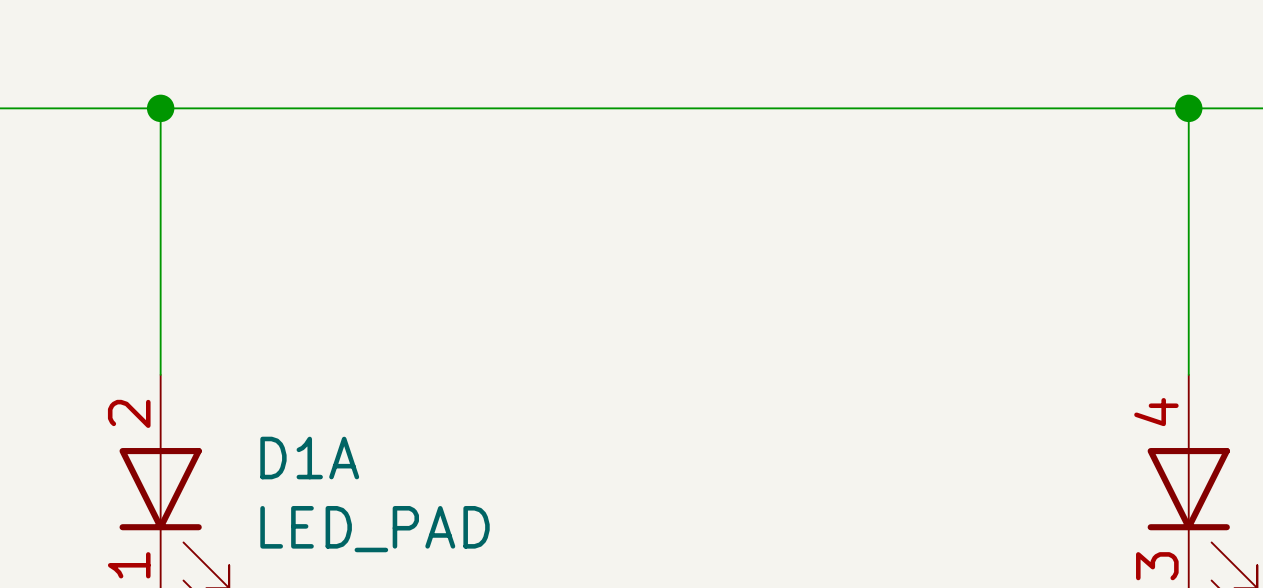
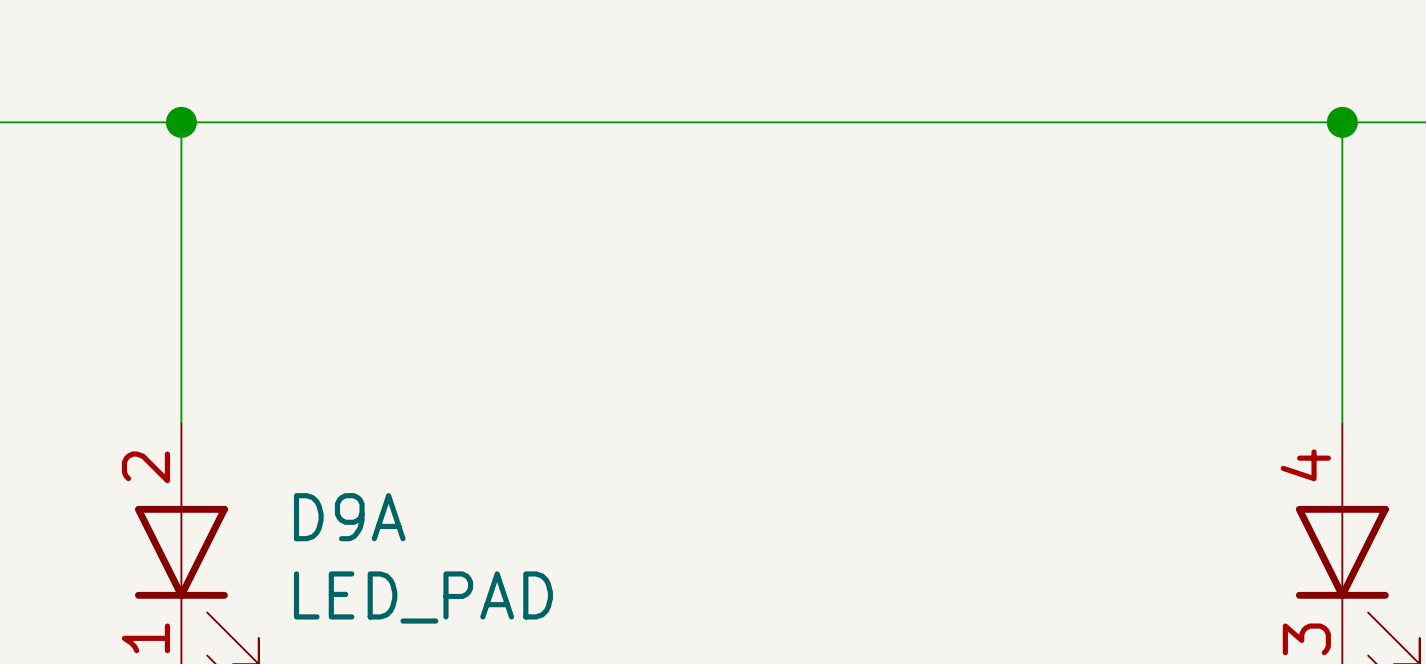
D1A name: D1A (309, 458) -> D9A (349, 517)

